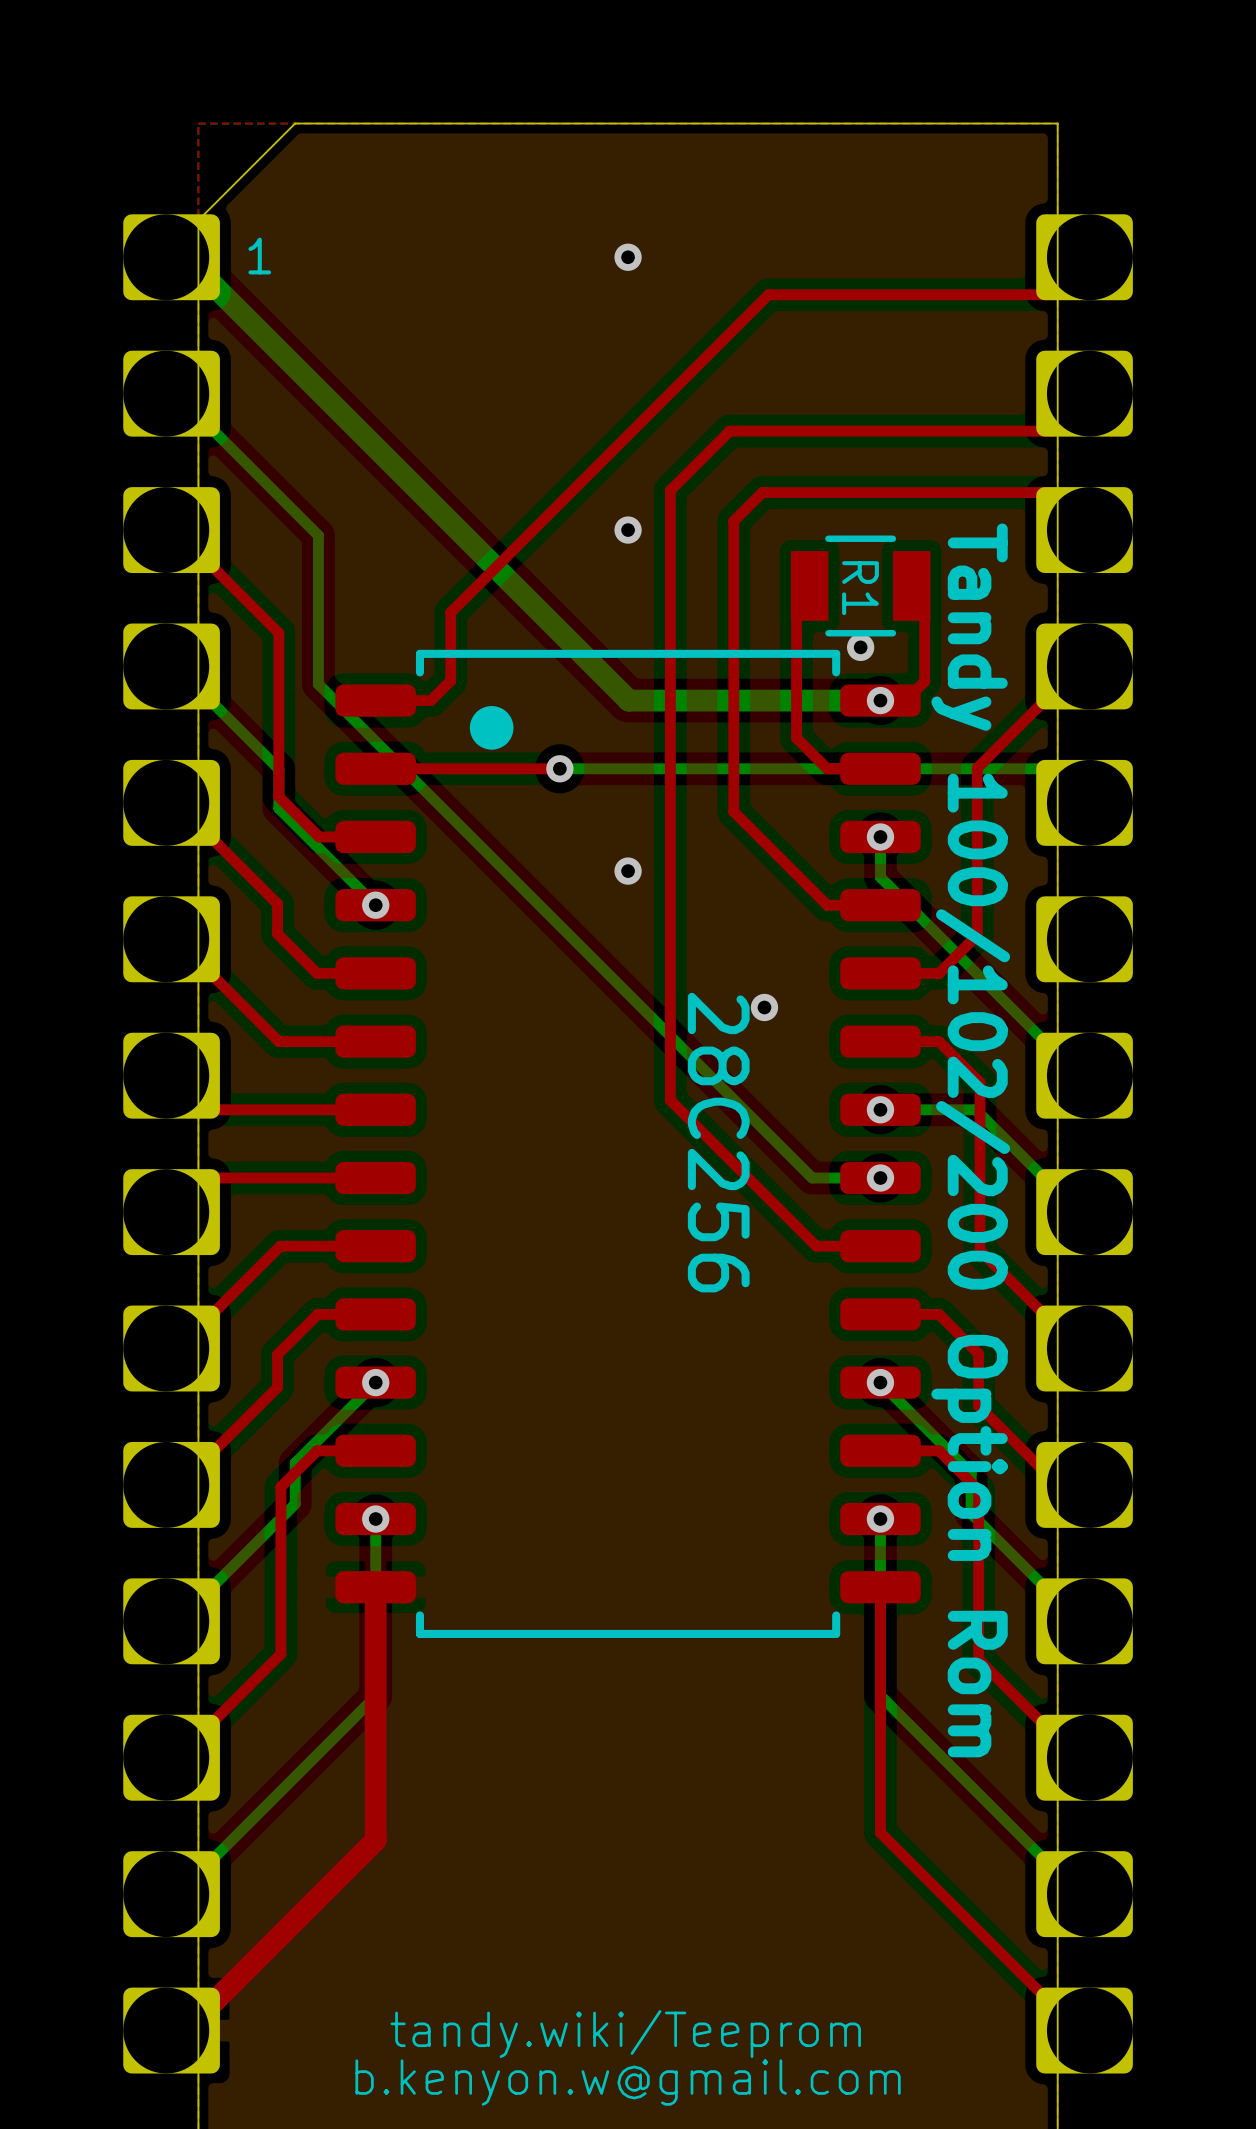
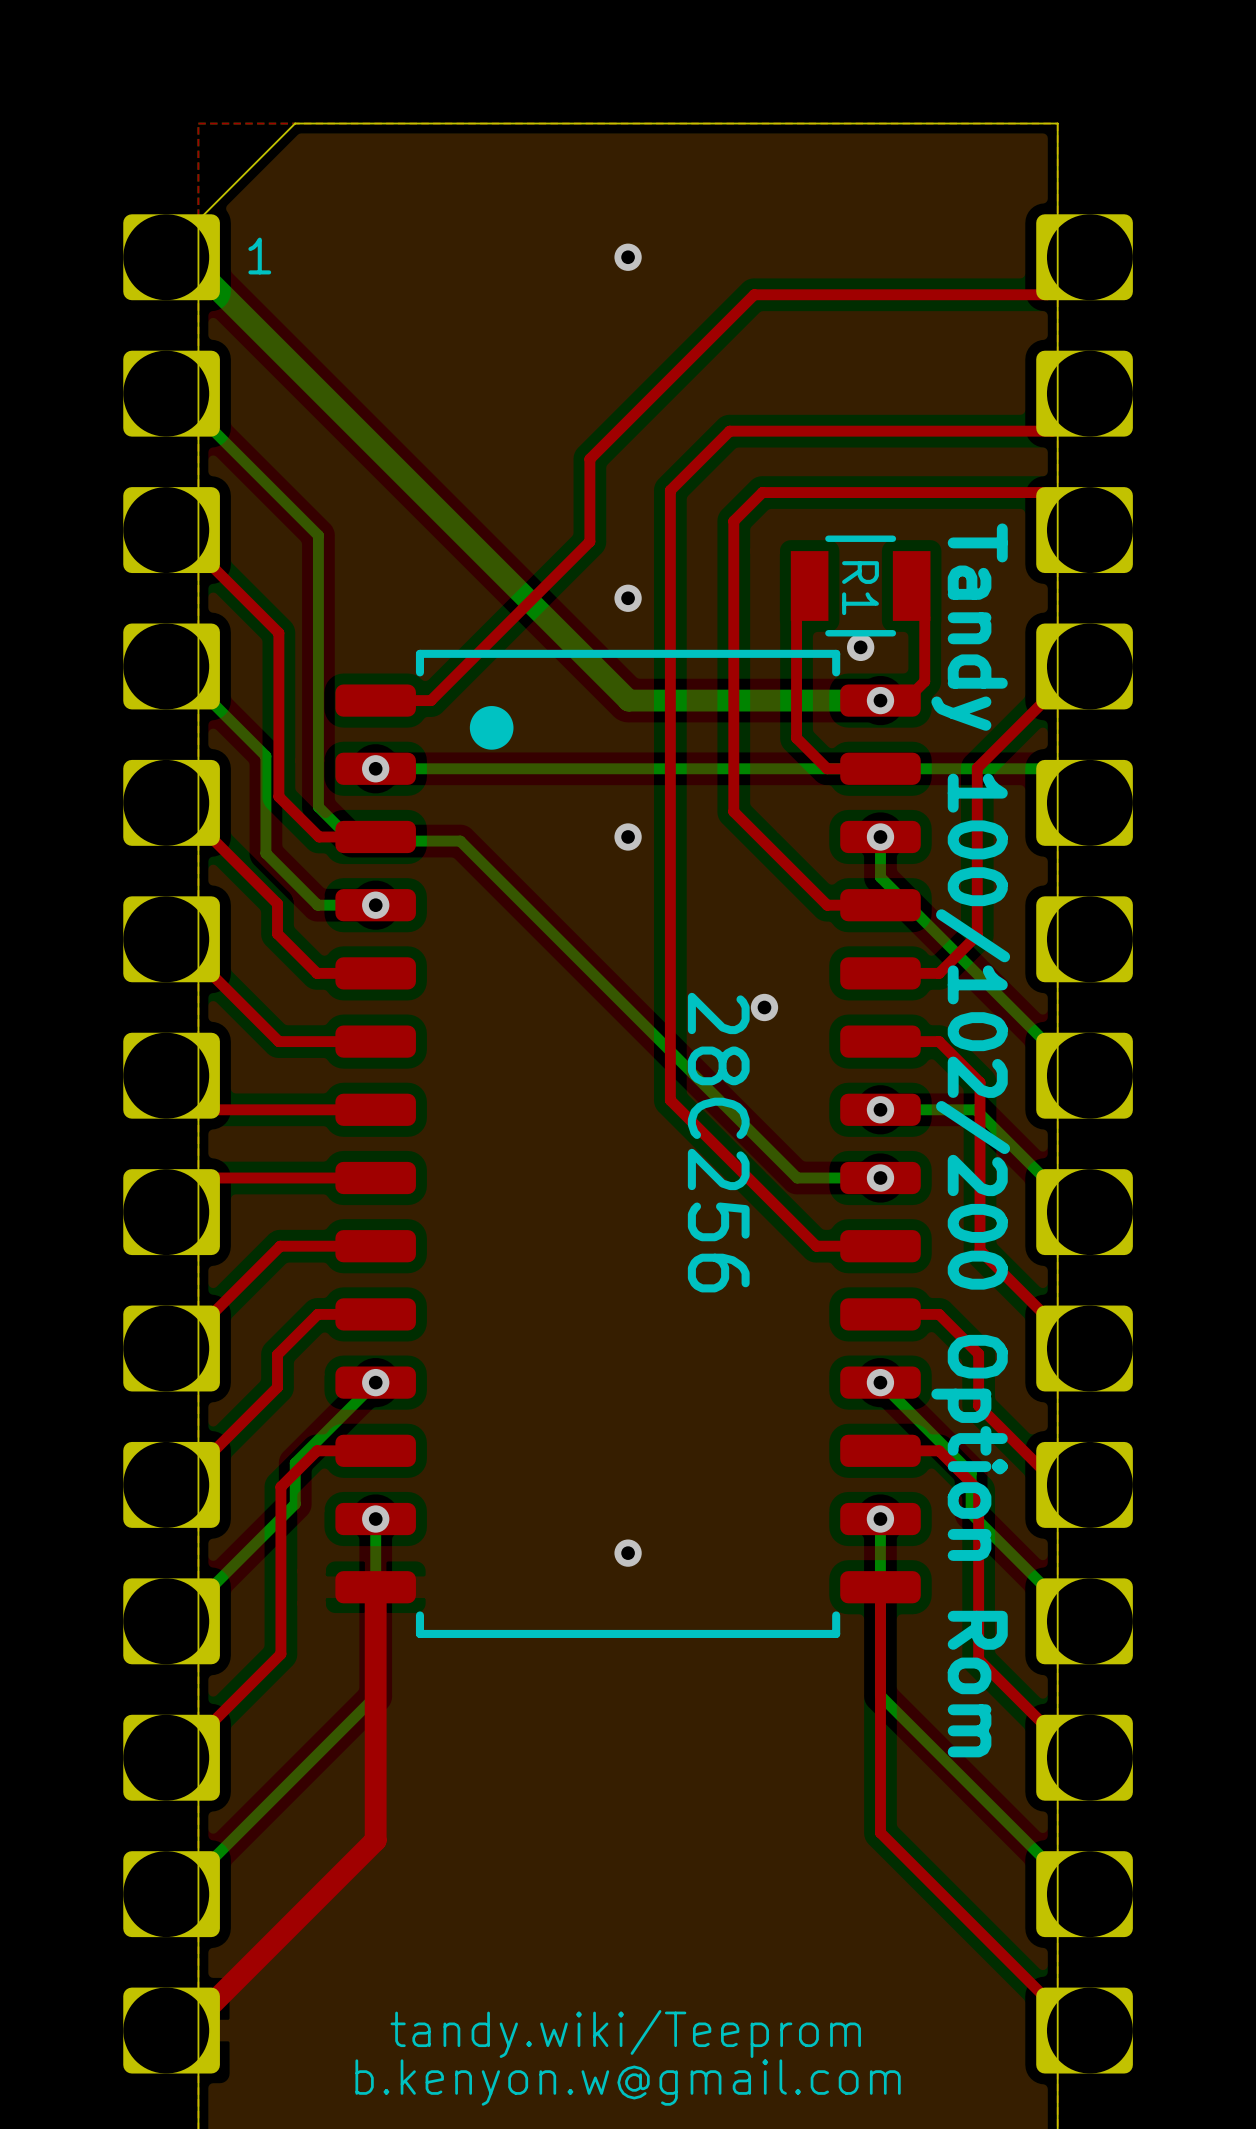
top track: (768, 294) (450, 612) (450, 680) -> (768, 294) (754, 294) (589, 459) (589, 541) (450, 680)
via position: (628, 530) -> (628, 598)
bottom track: (318, 684) (812, 1178) -> (318, 684) (318, 806) (352, 841) (460, 841) (797, 1178) (812, 1178)
bottom track: (265, 756) (278, 769) (278, 808) (375, 905) -> (265, 756) (265, 853) (317, 905) (375, 905)
top track: (375, 768) (559, 768) -> none
bottom track: none -> (375, 768) (559, 768)
via: none -> (375, 768)
via: (559, 768) -> none
via position: (628, 871) -> (628, 836)
via: none -> (628, 1553)

